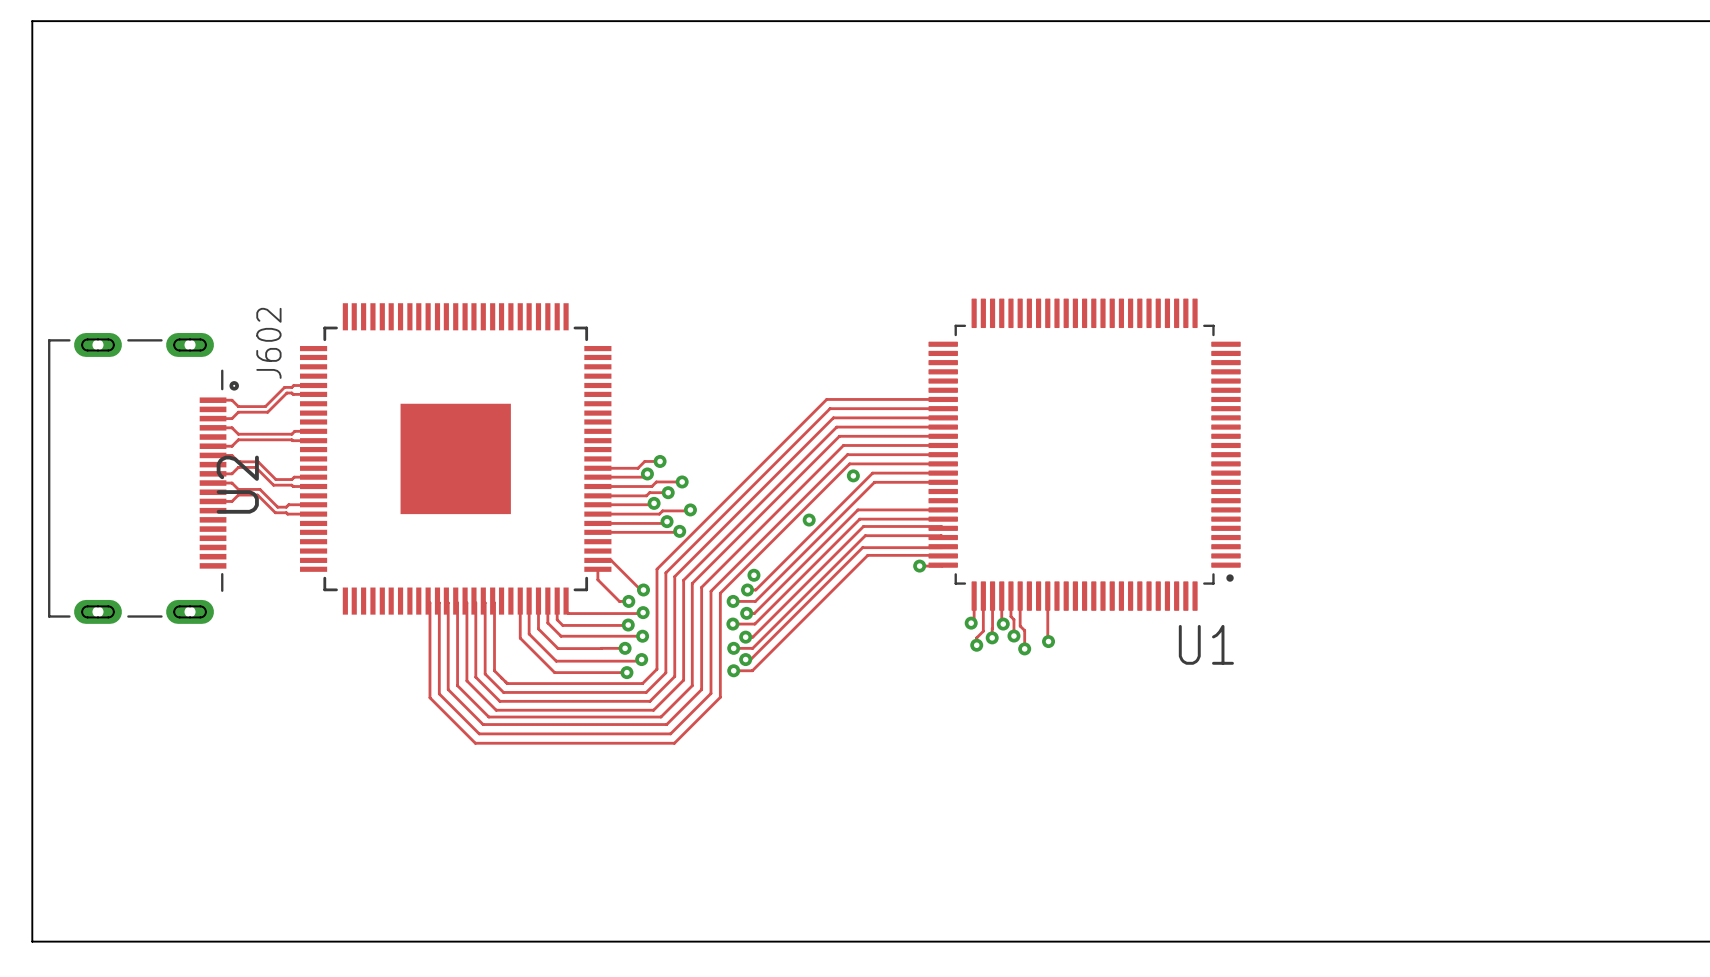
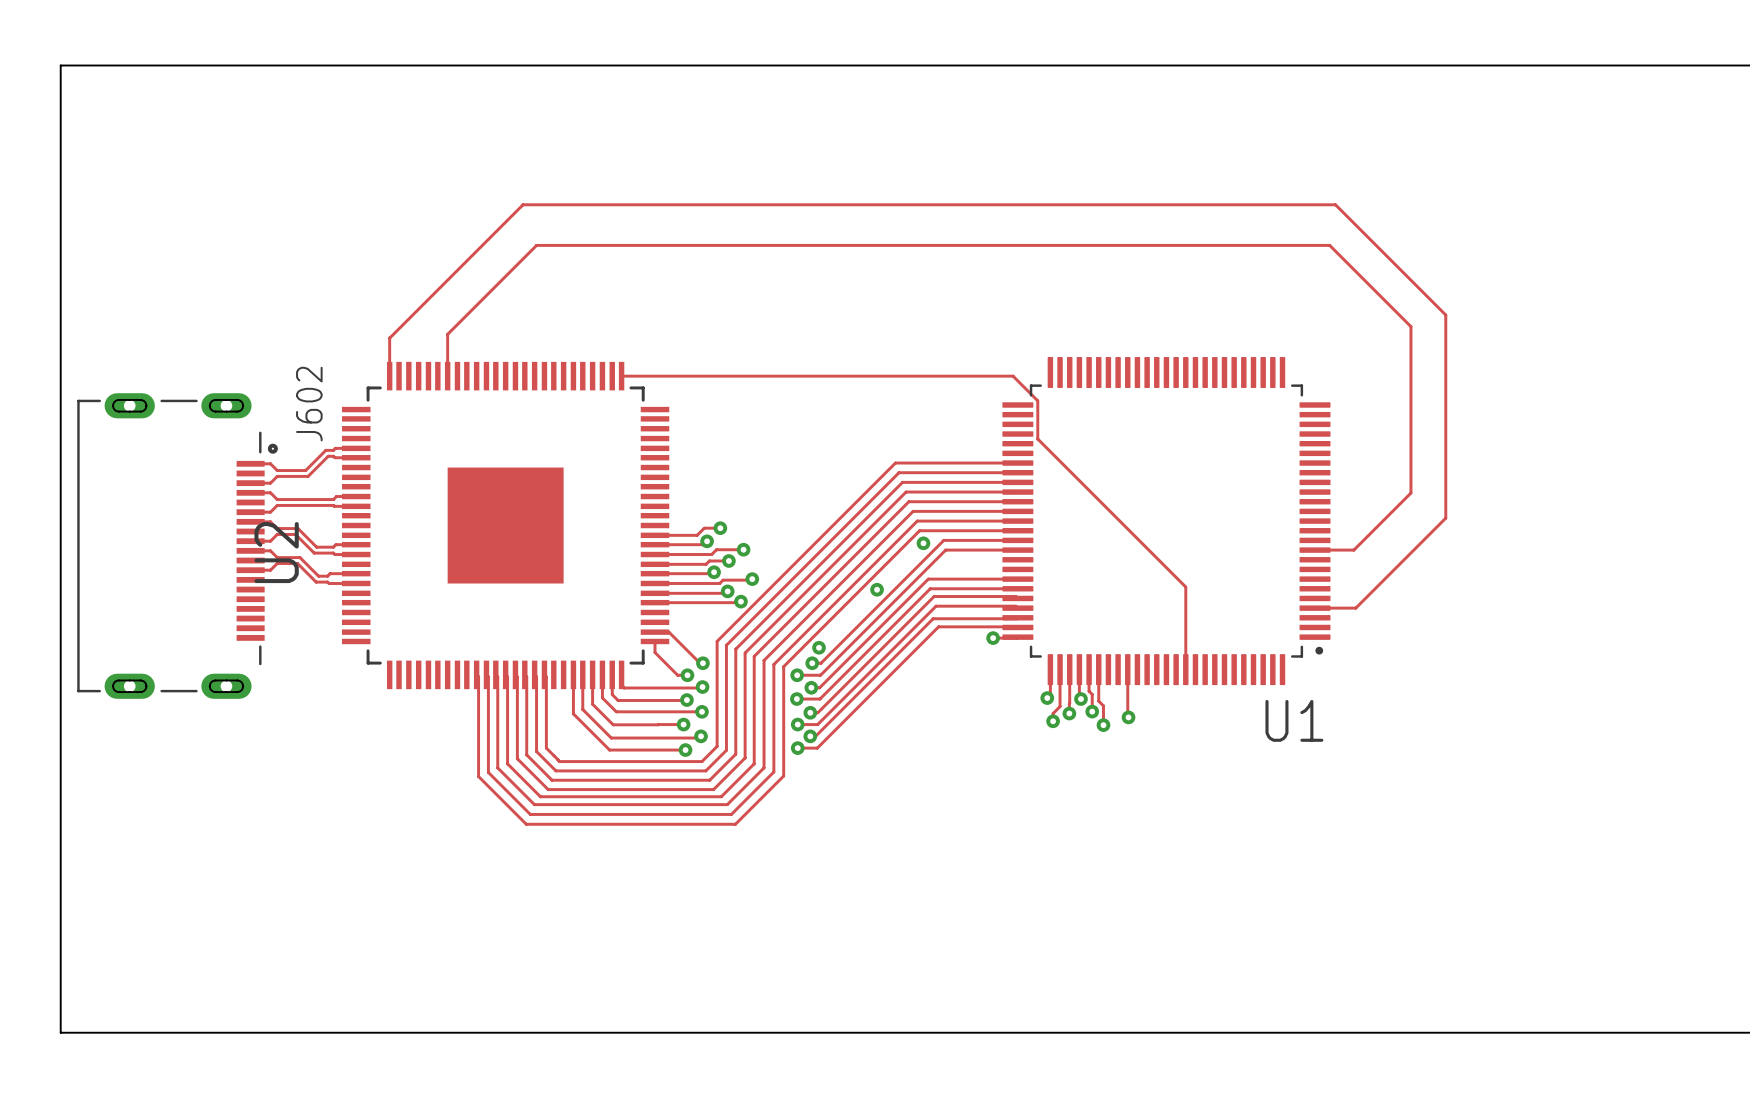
track: none -> (389, 376) (389, 338) (523, 204) (1335, 204) (1445, 315) (1445, 518) (1355, 608) (1315, 608)
track: none -> (447, 376) (447, 334) (536, 245) (1329, 245) (1410, 326) (1410, 493) (1353, 550) (1315, 550)
track: none -> (621, 376) (1013, 376) (1037, 400) (1037, 439) (1185, 587) (1185, 669)

